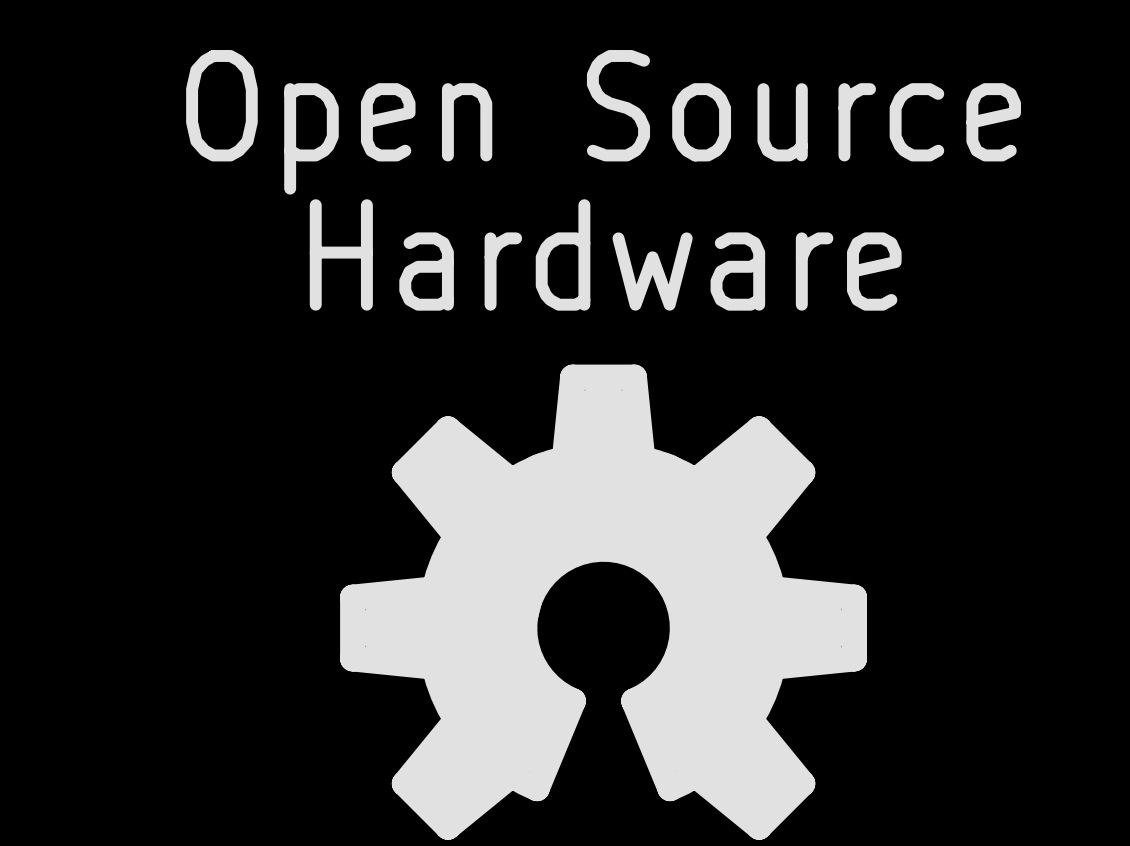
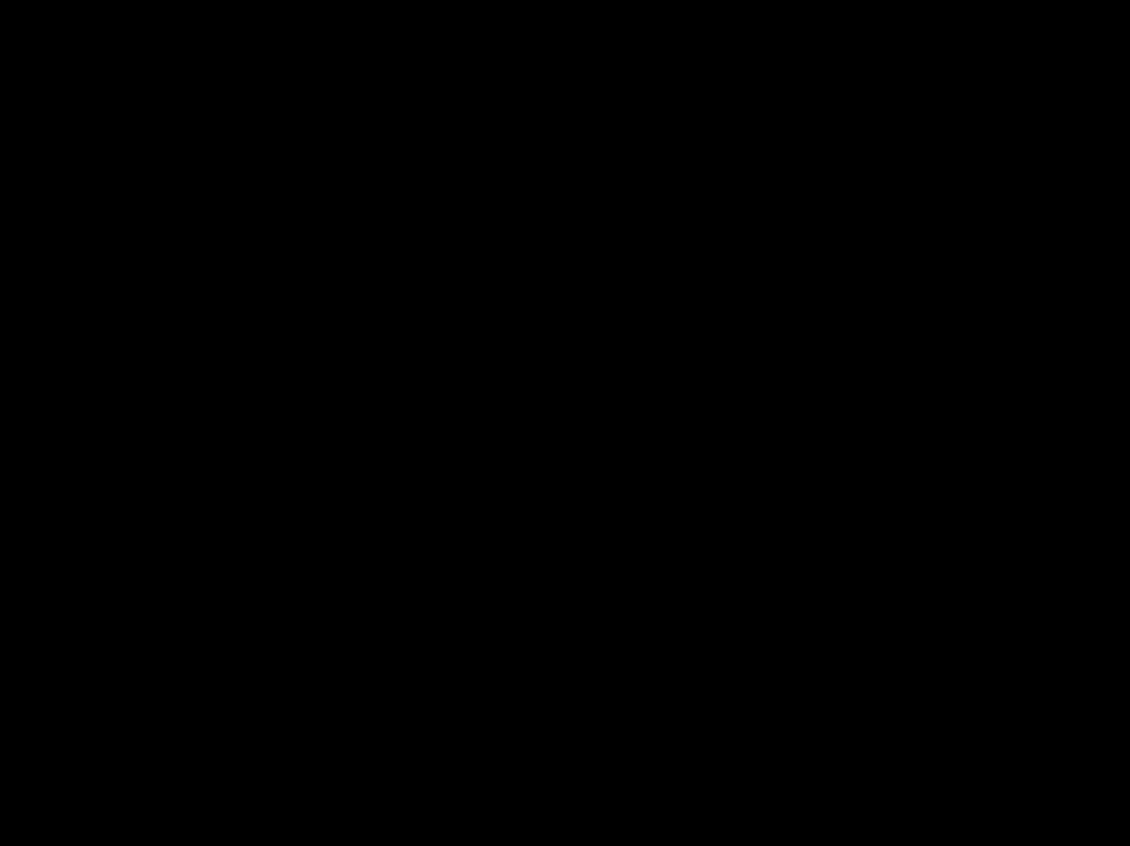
text: Open Source (603, 122) -> none
text: Hardware (605, 254) -> none
drawing: [340, 364, 868, 840] -> none

